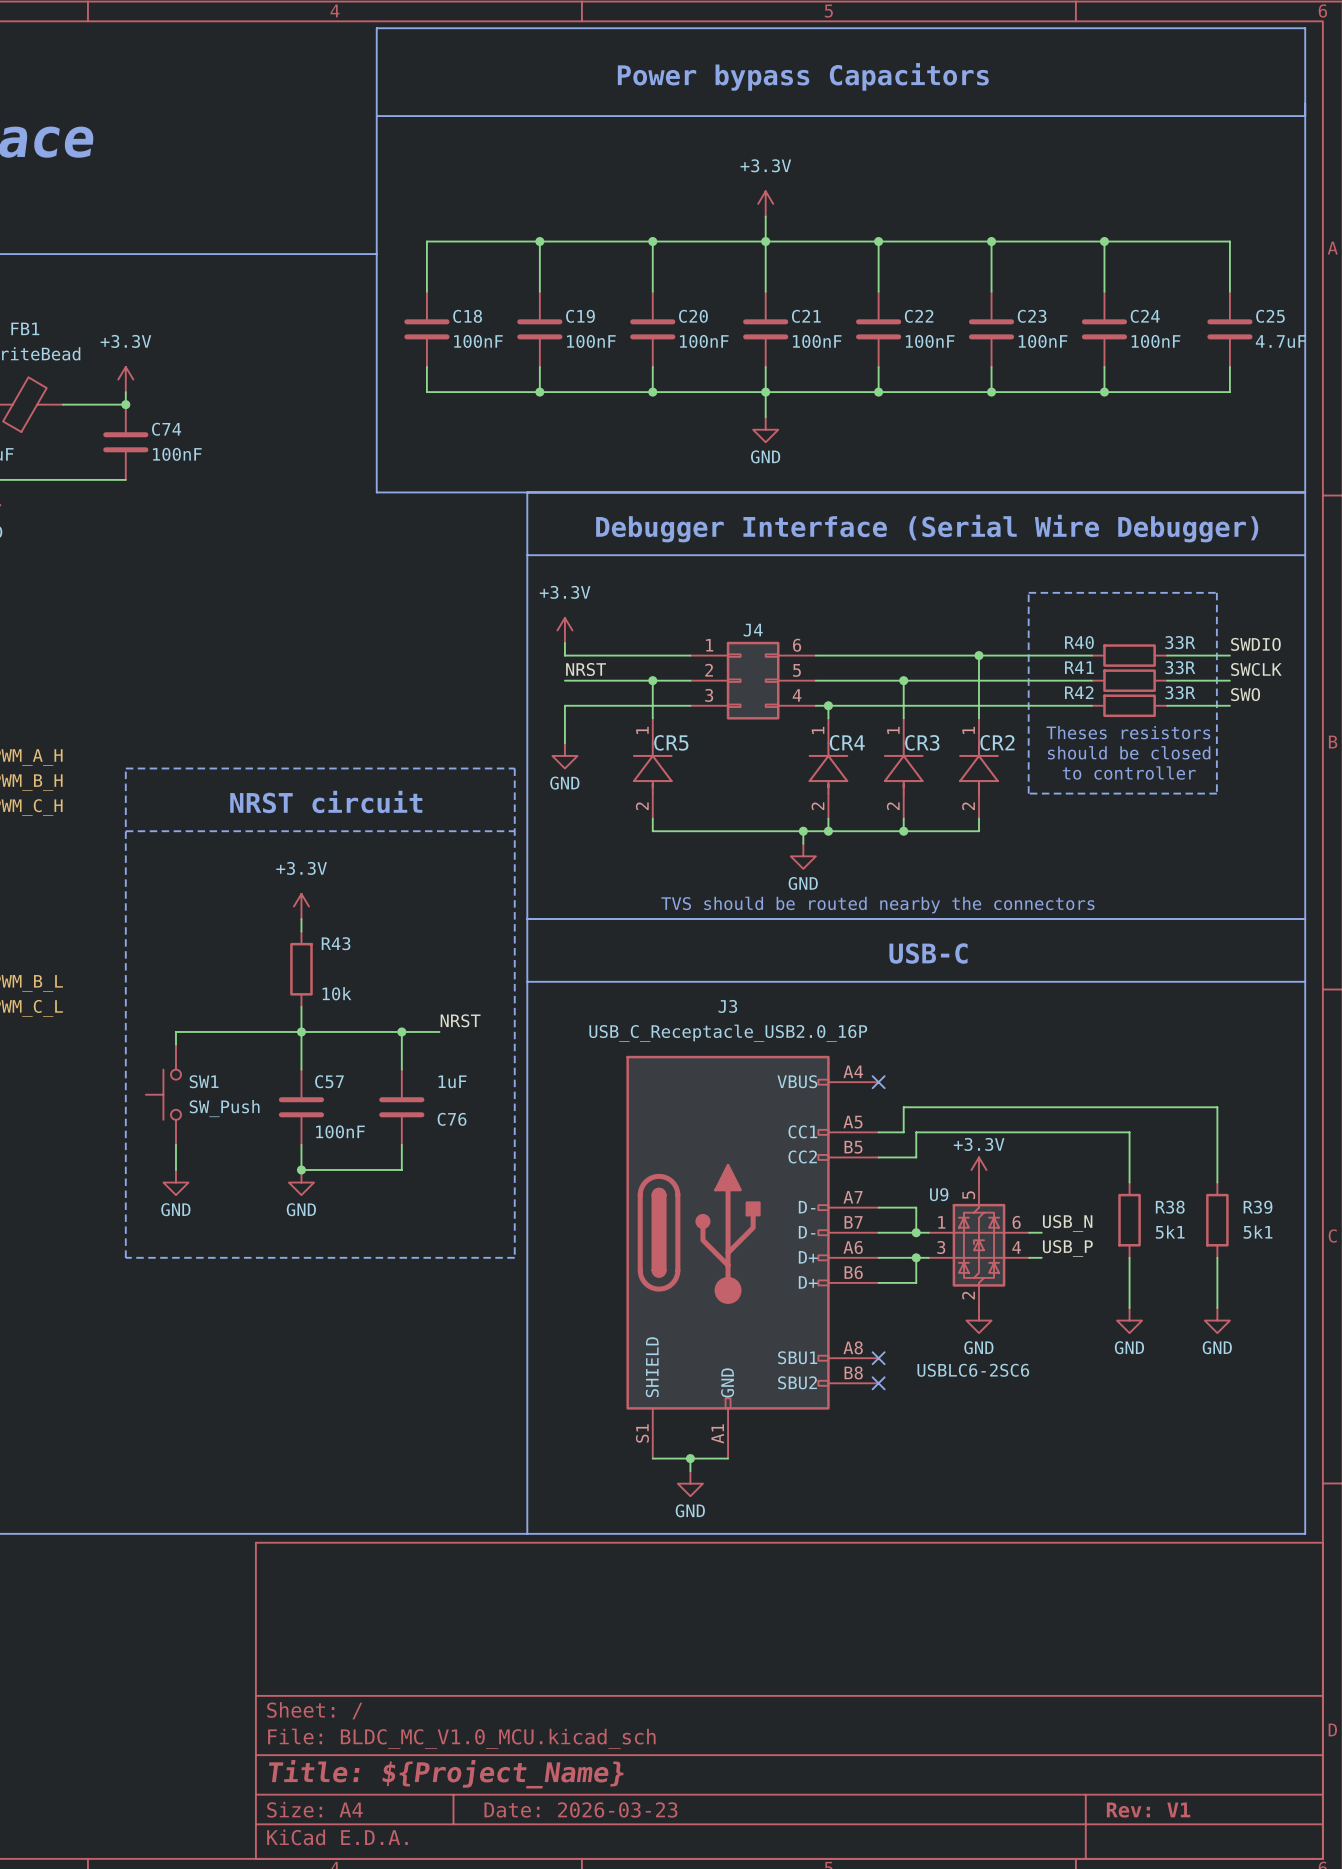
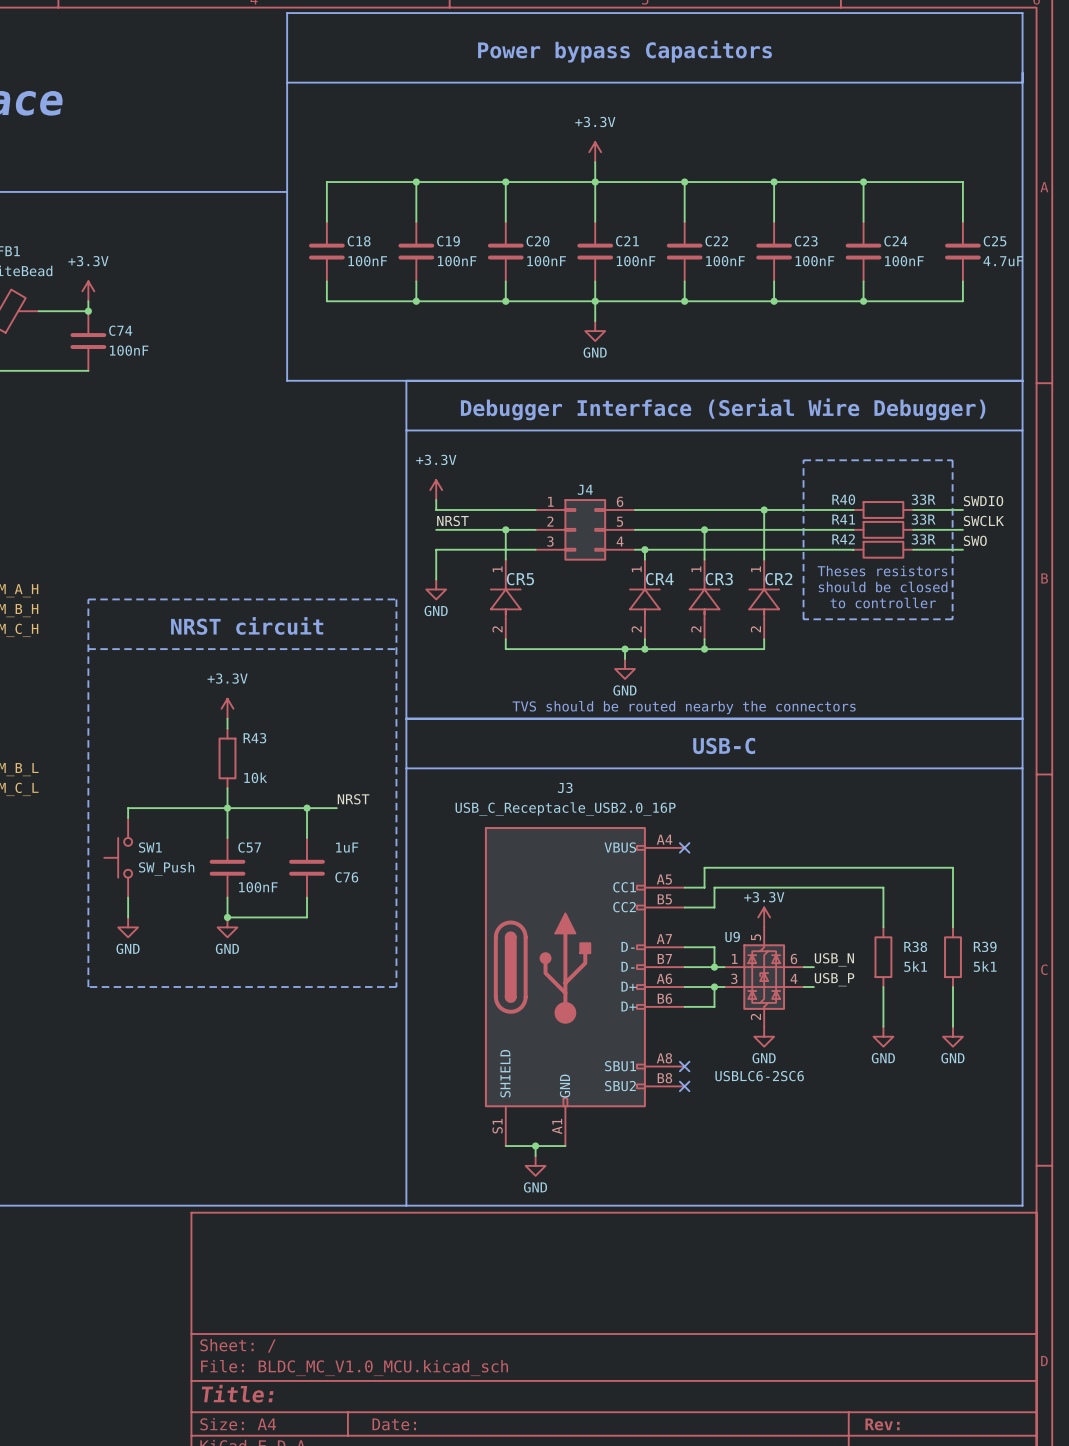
title block: Title: ${Project_Name} (446, 1774) -> Title: (237, 1393)
title block: Date: 2026-03-23 (580, 1809) -> Date: (394, 1424)
title block: Rev: V1 (1148, 1810) -> Rev: (882, 1424)

